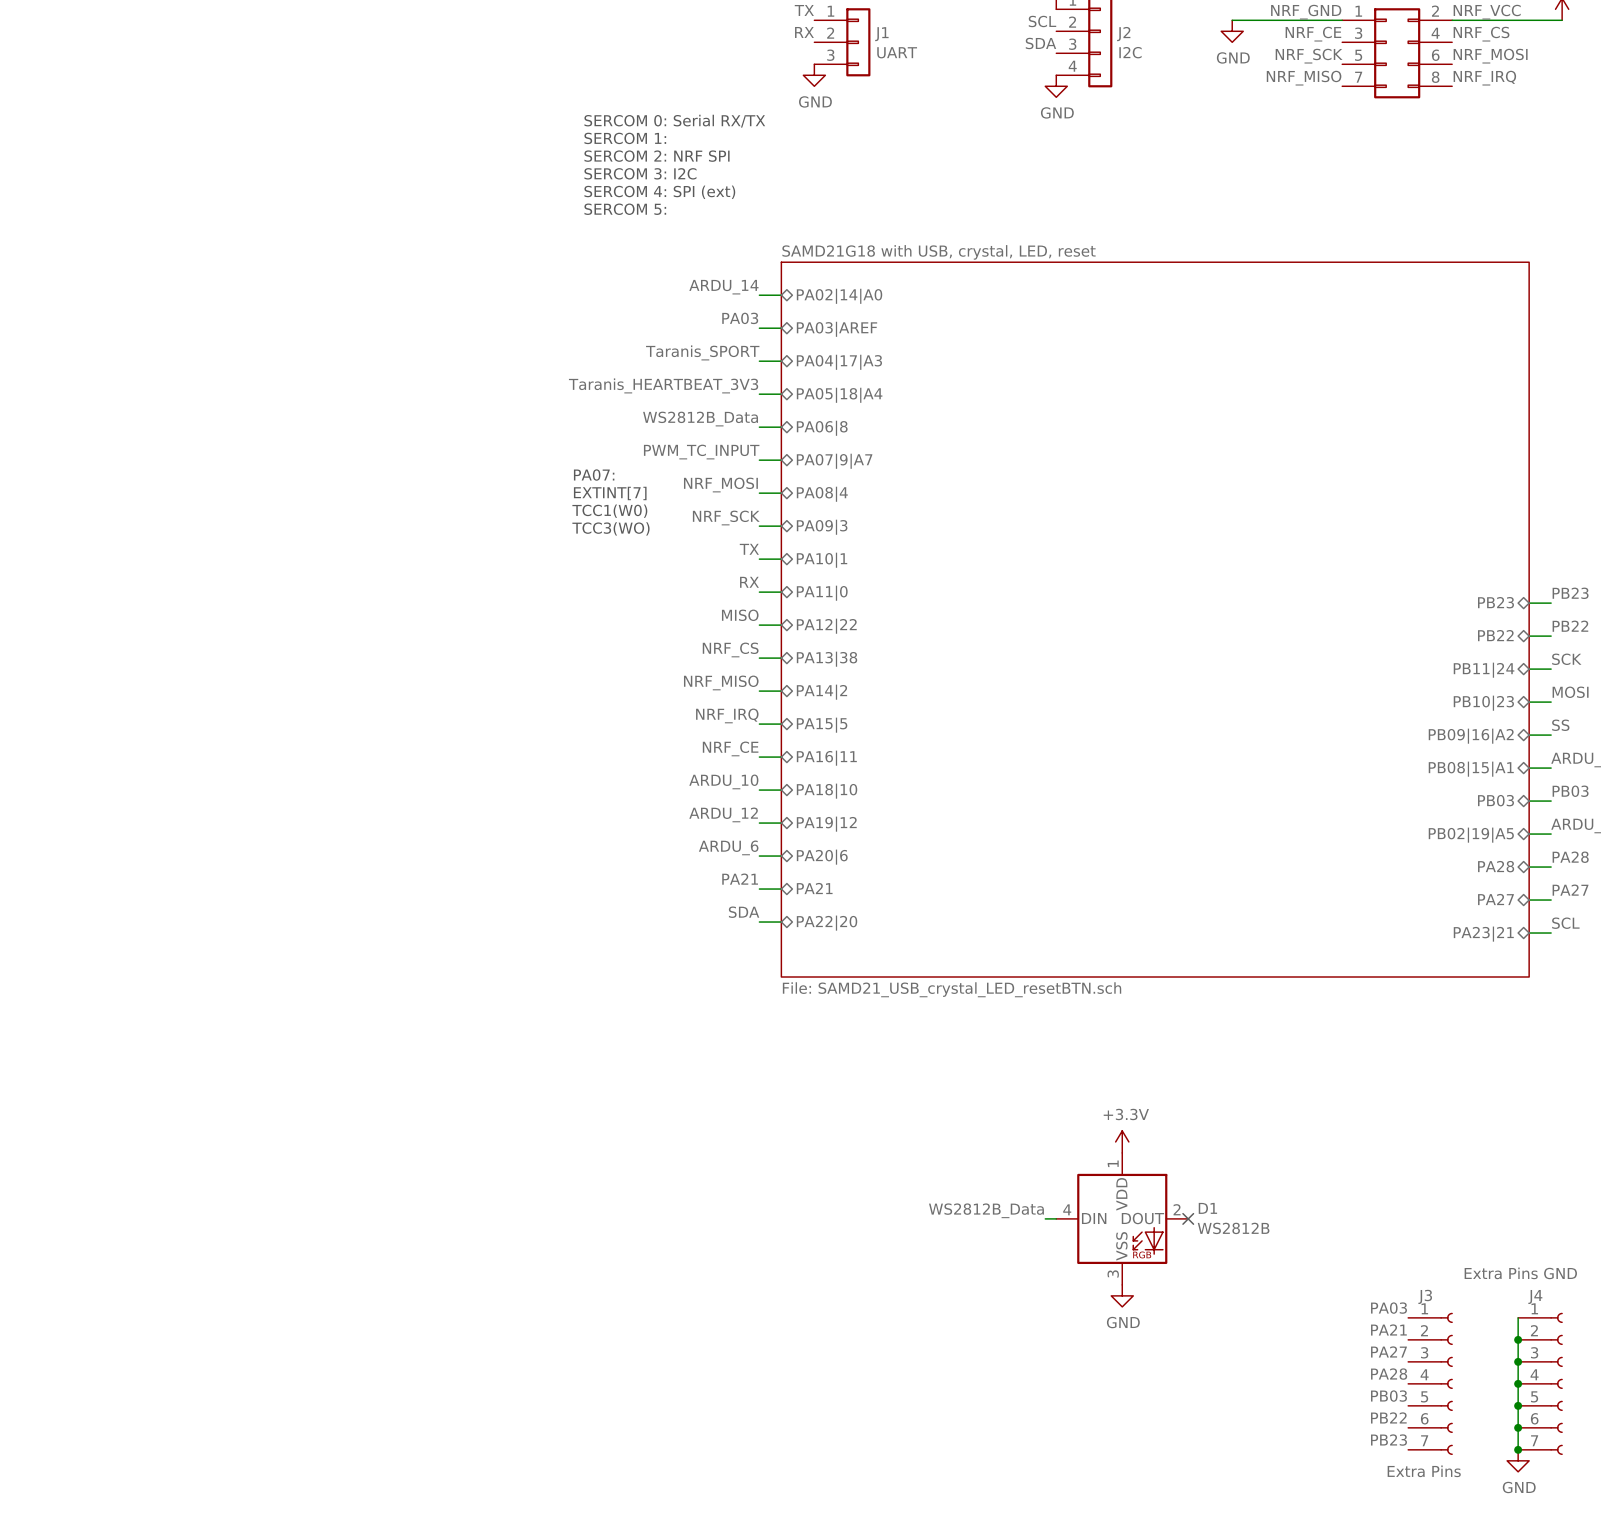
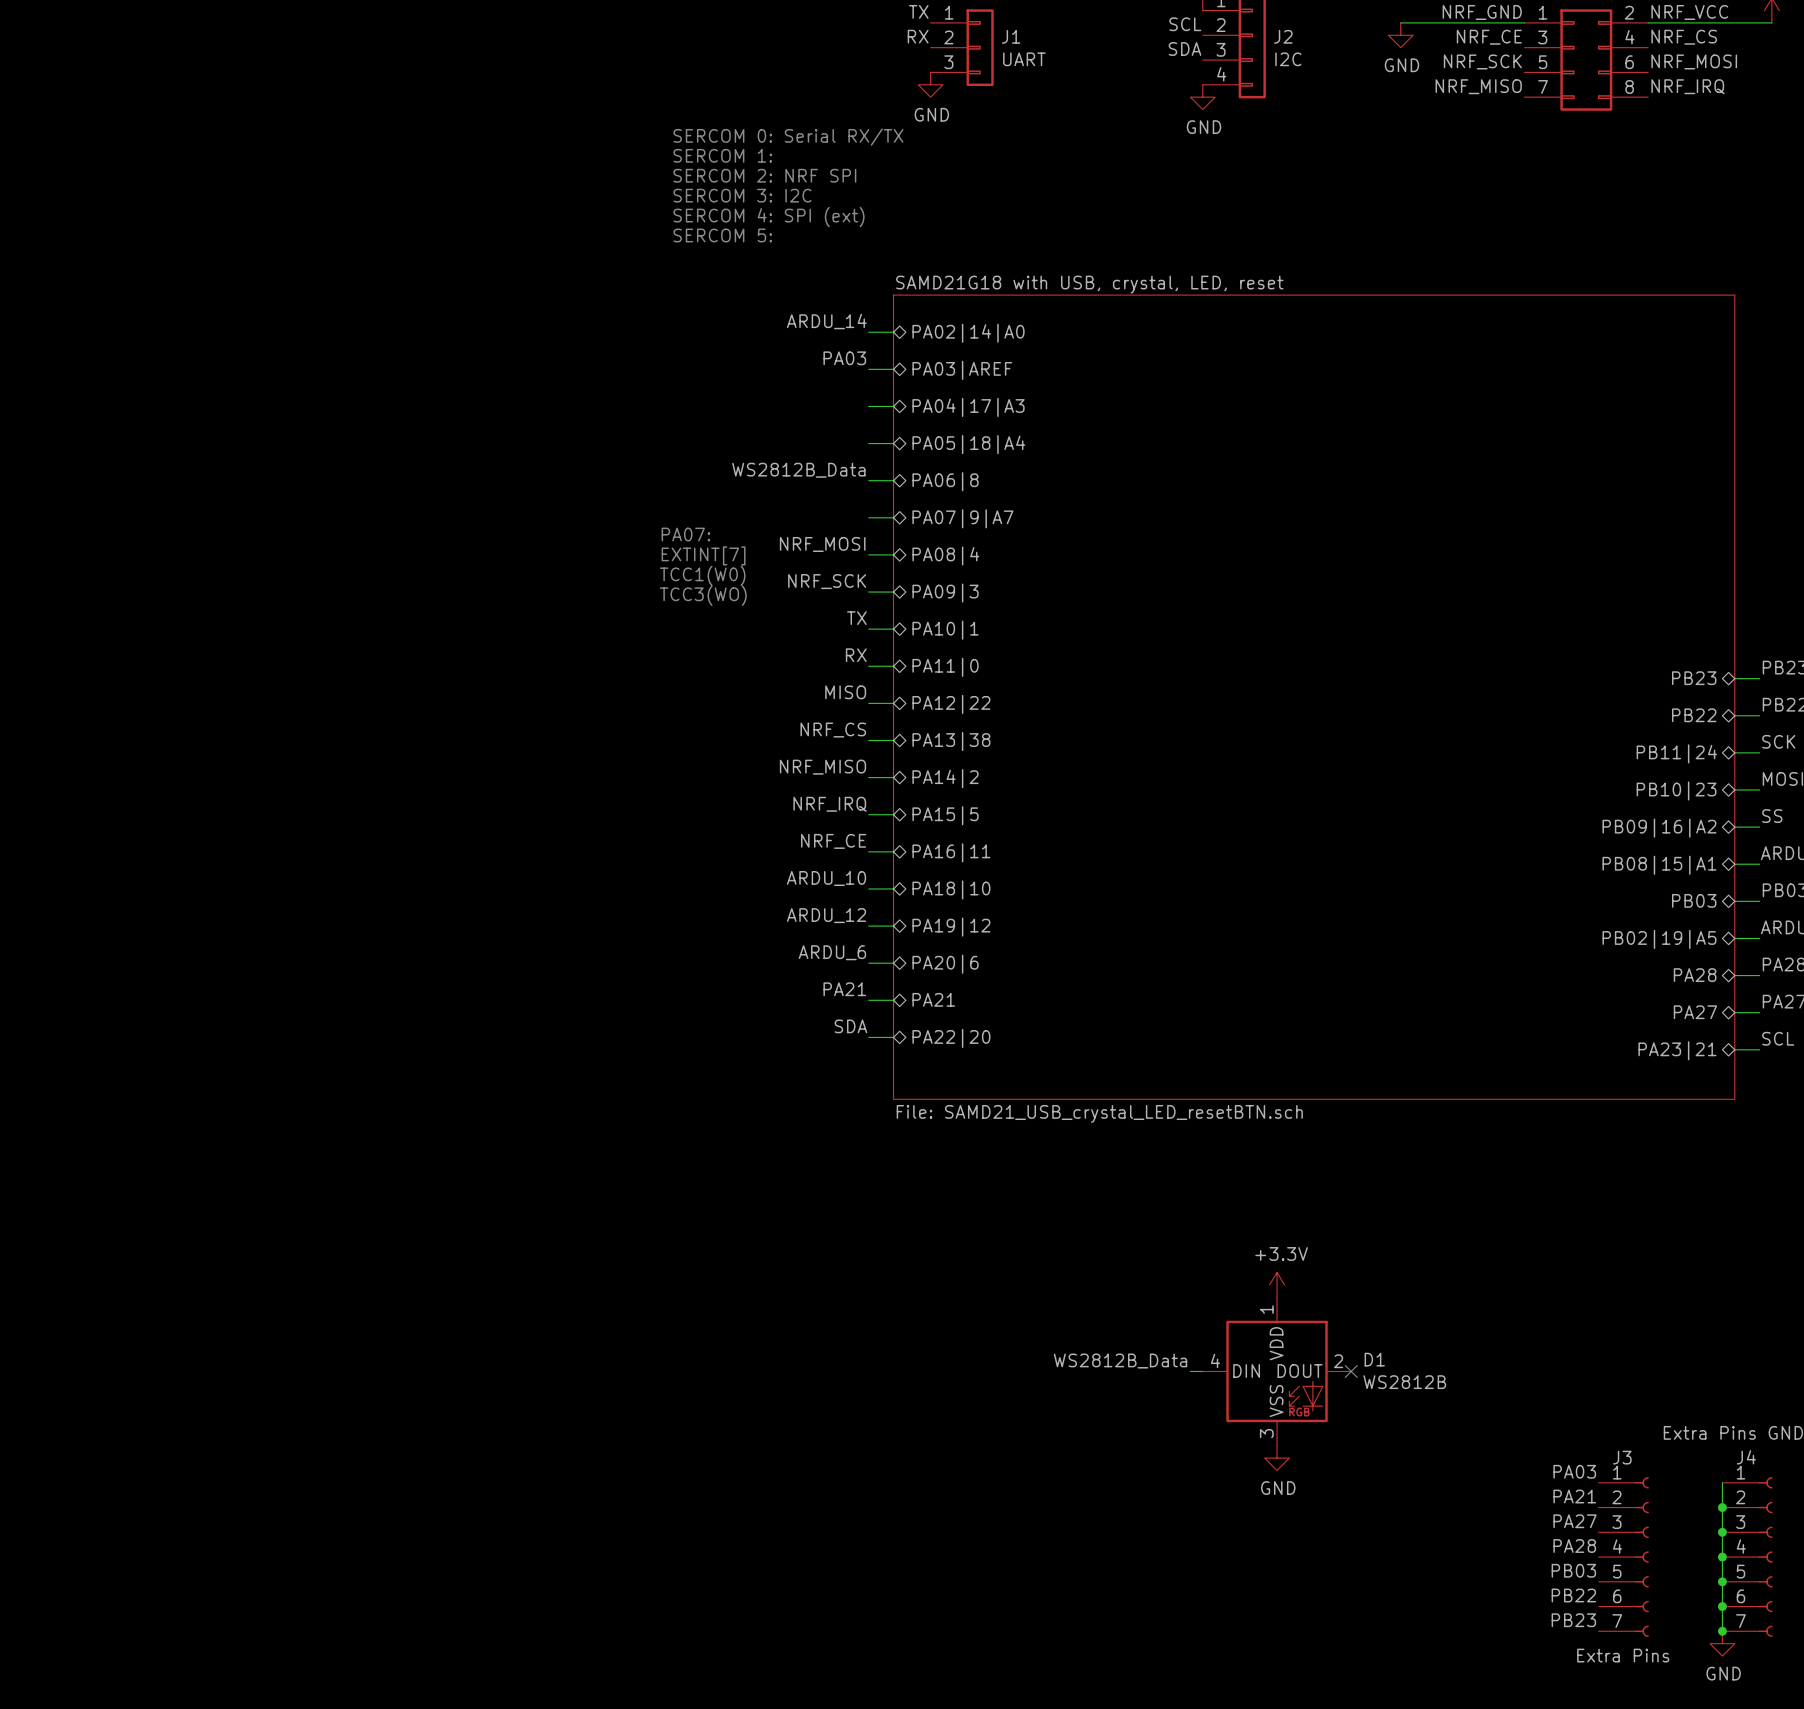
label: Taranis_SPORT (702, 352) -> none
label: Taranis_HEARTBEAT_3V3 (663, 385) -> none
label: PWM_TC_INPUT (701, 452) -> none

